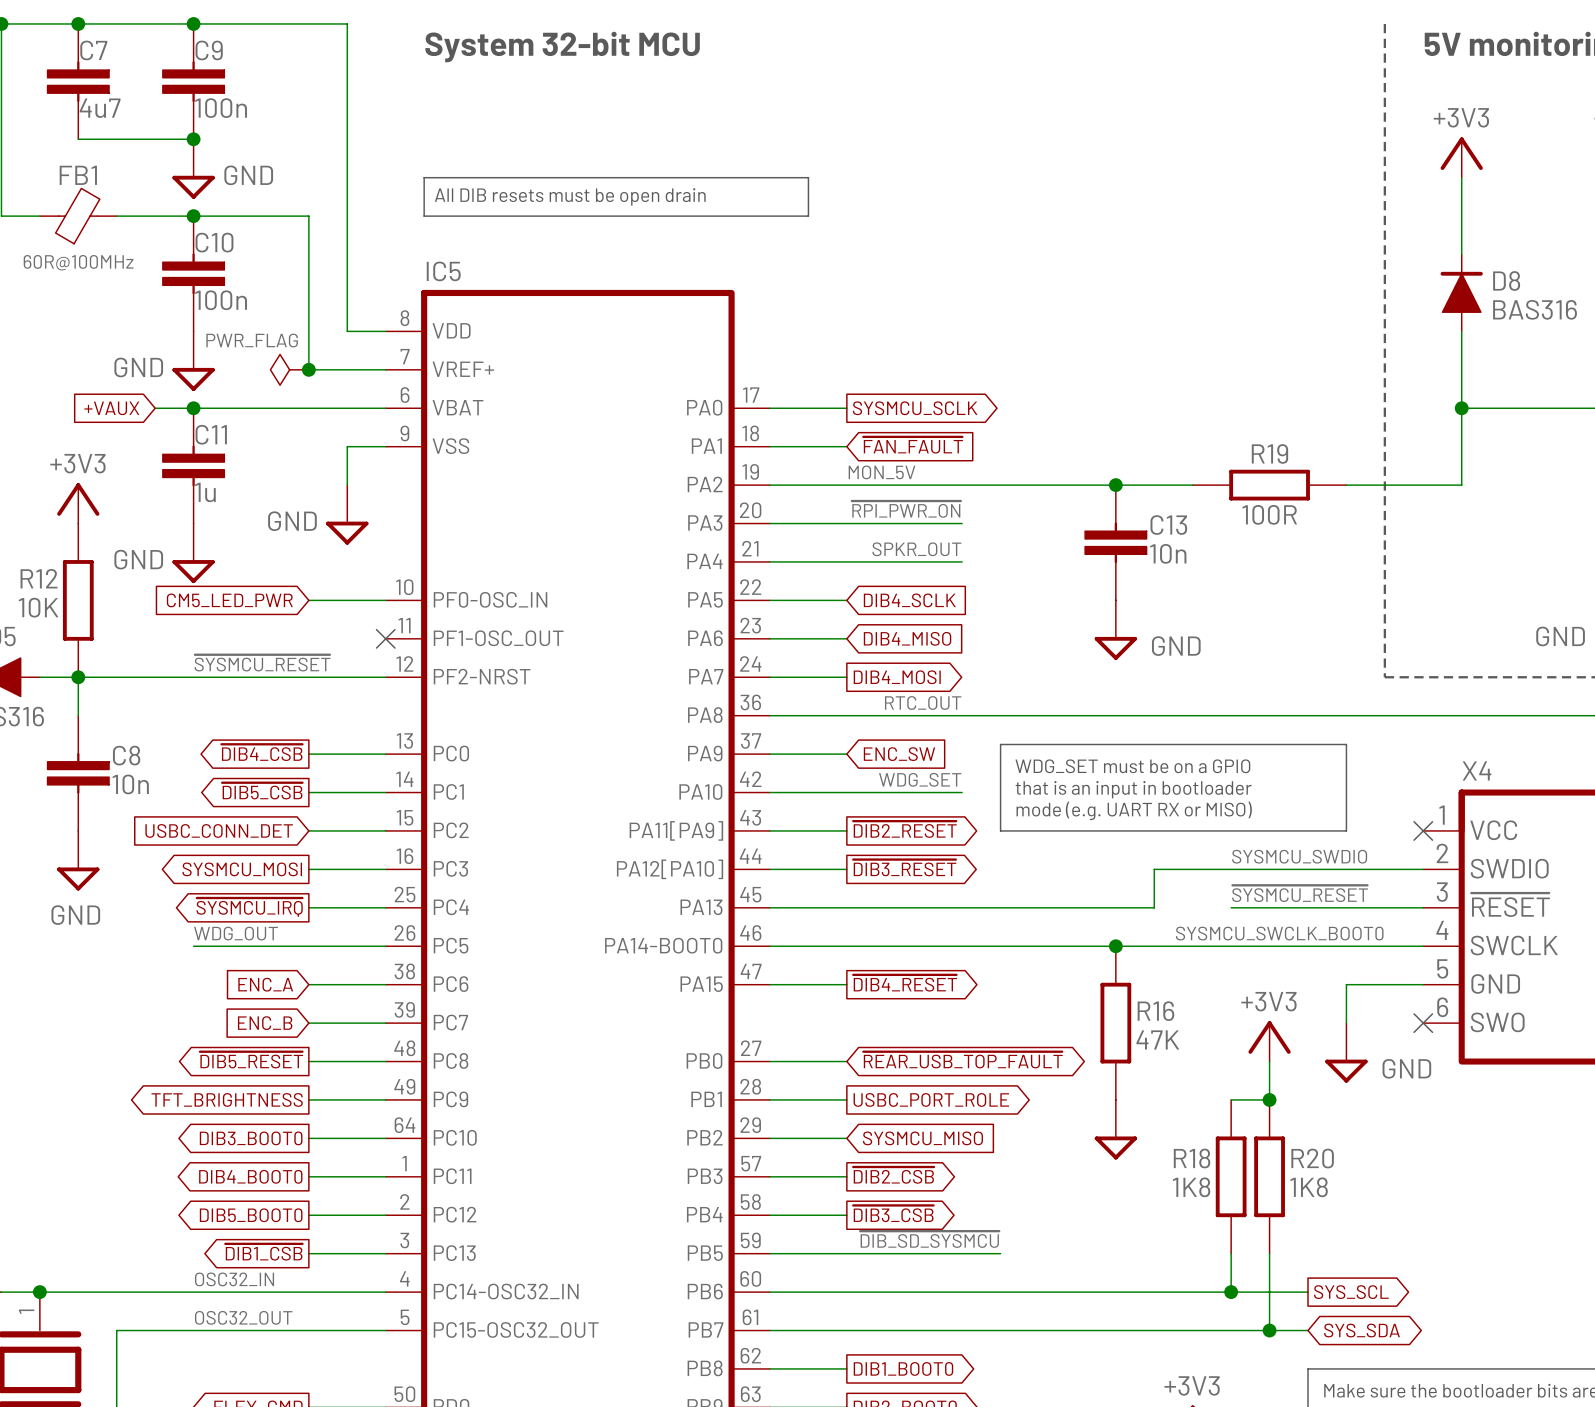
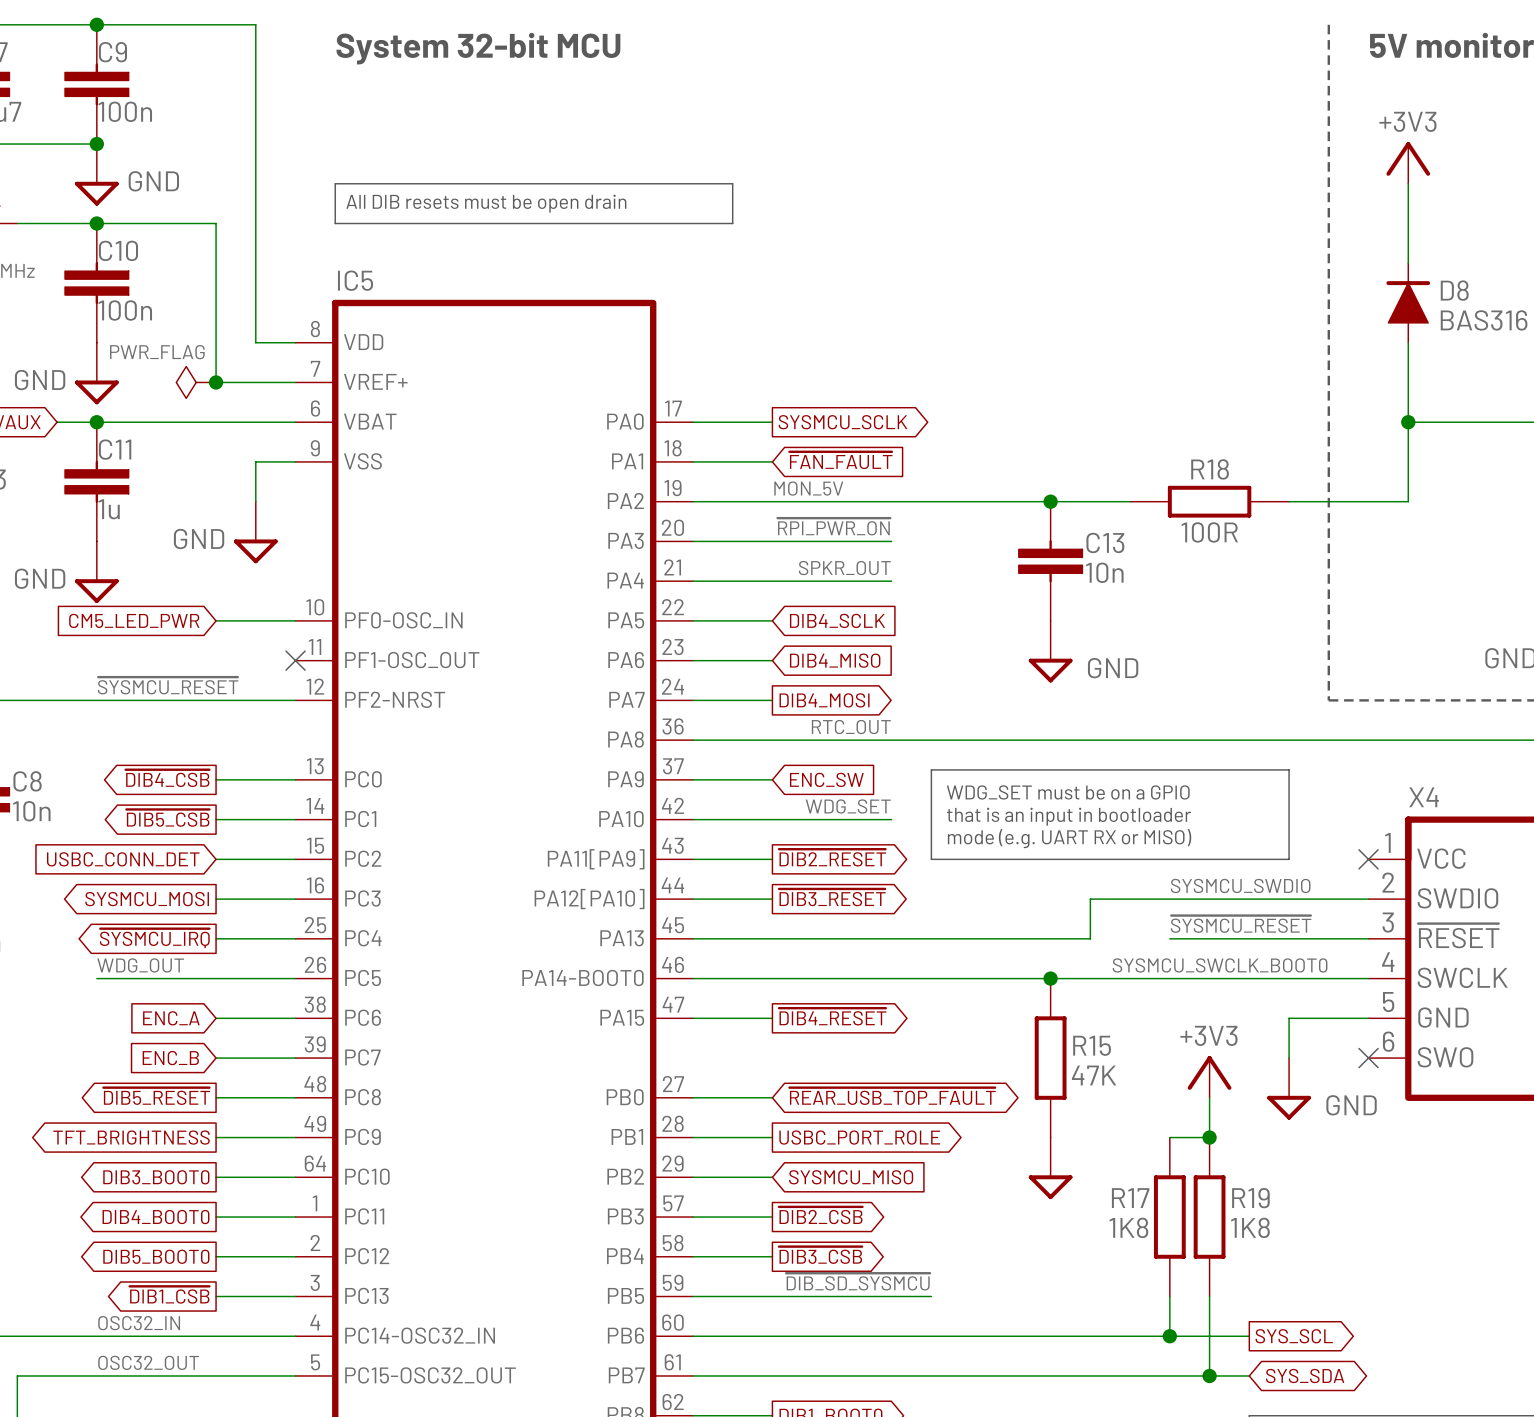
R19 name: R19 (1269, 453) -> R18 (1210, 469)
R16 name: R16 (1155, 1011) -> R15 (1092, 1045)
R18 name: R18 (1192, 1158) -> R17 (1130, 1198)
R20 name: R20 (1312, 1158) -> R19 (1250, 1198)

